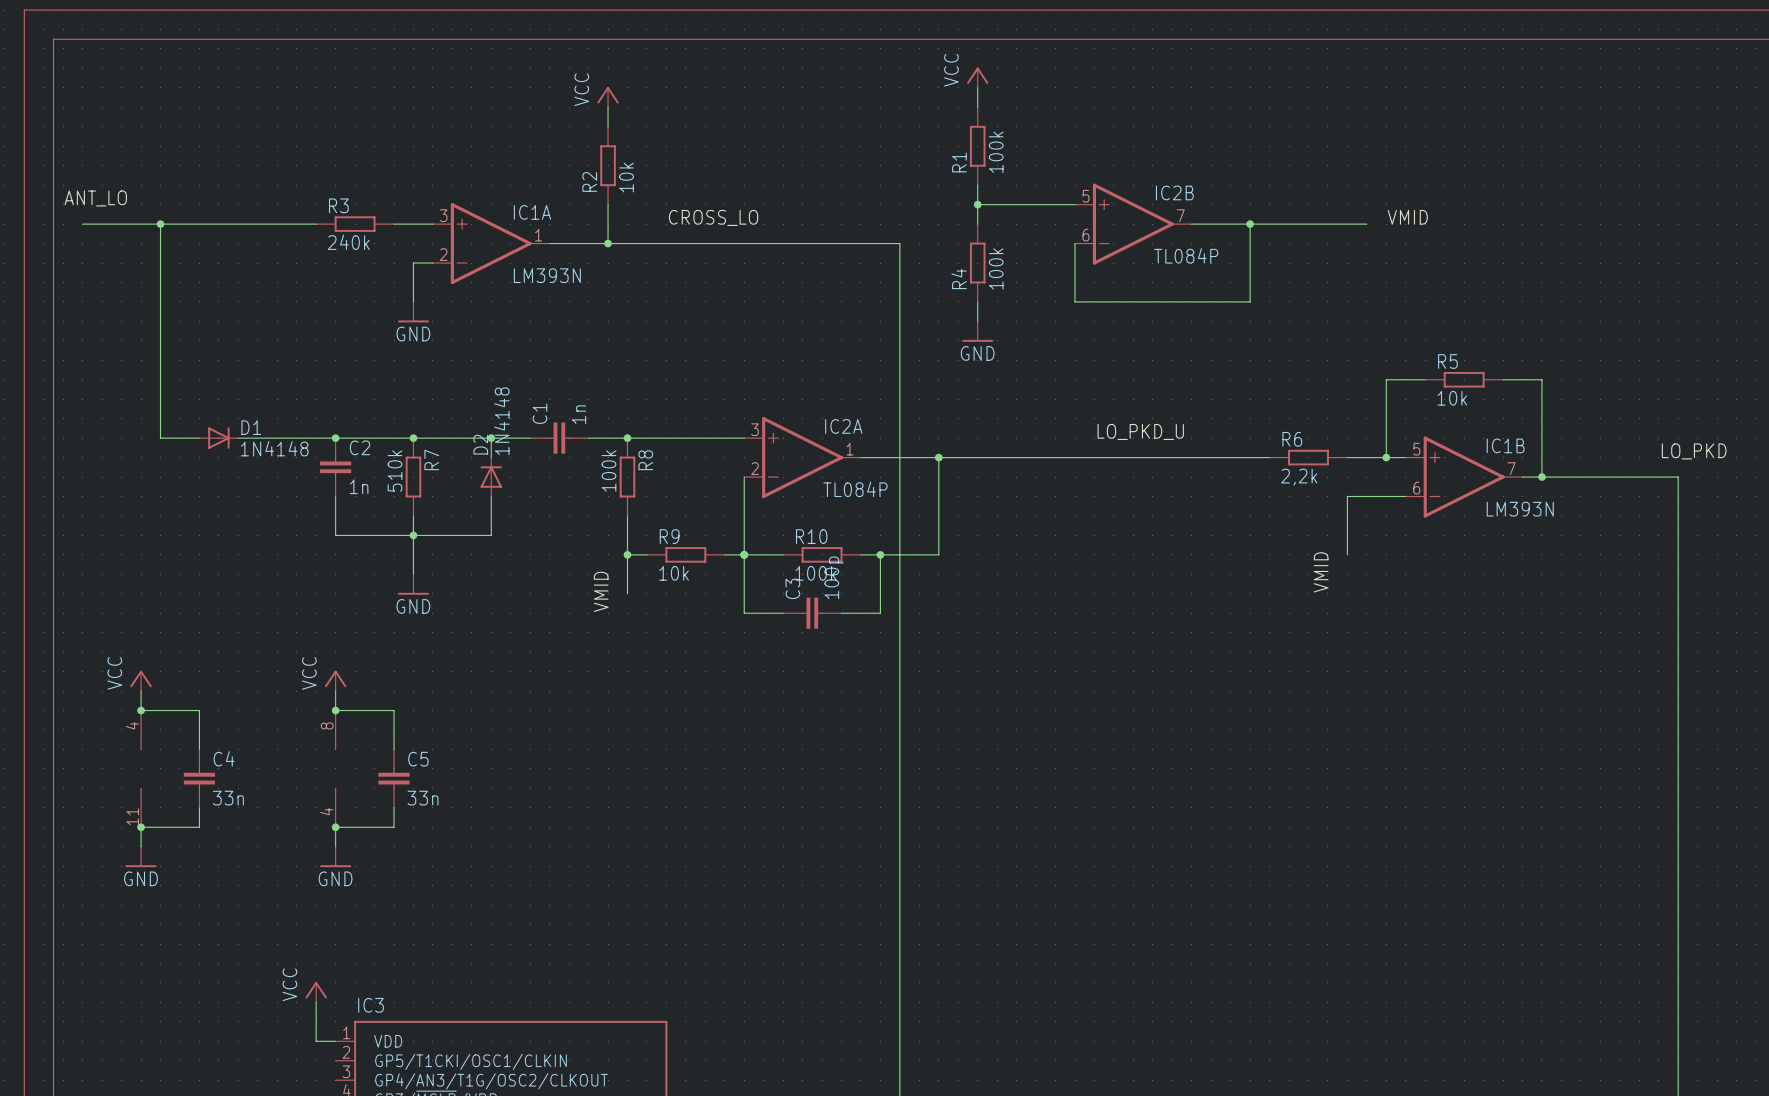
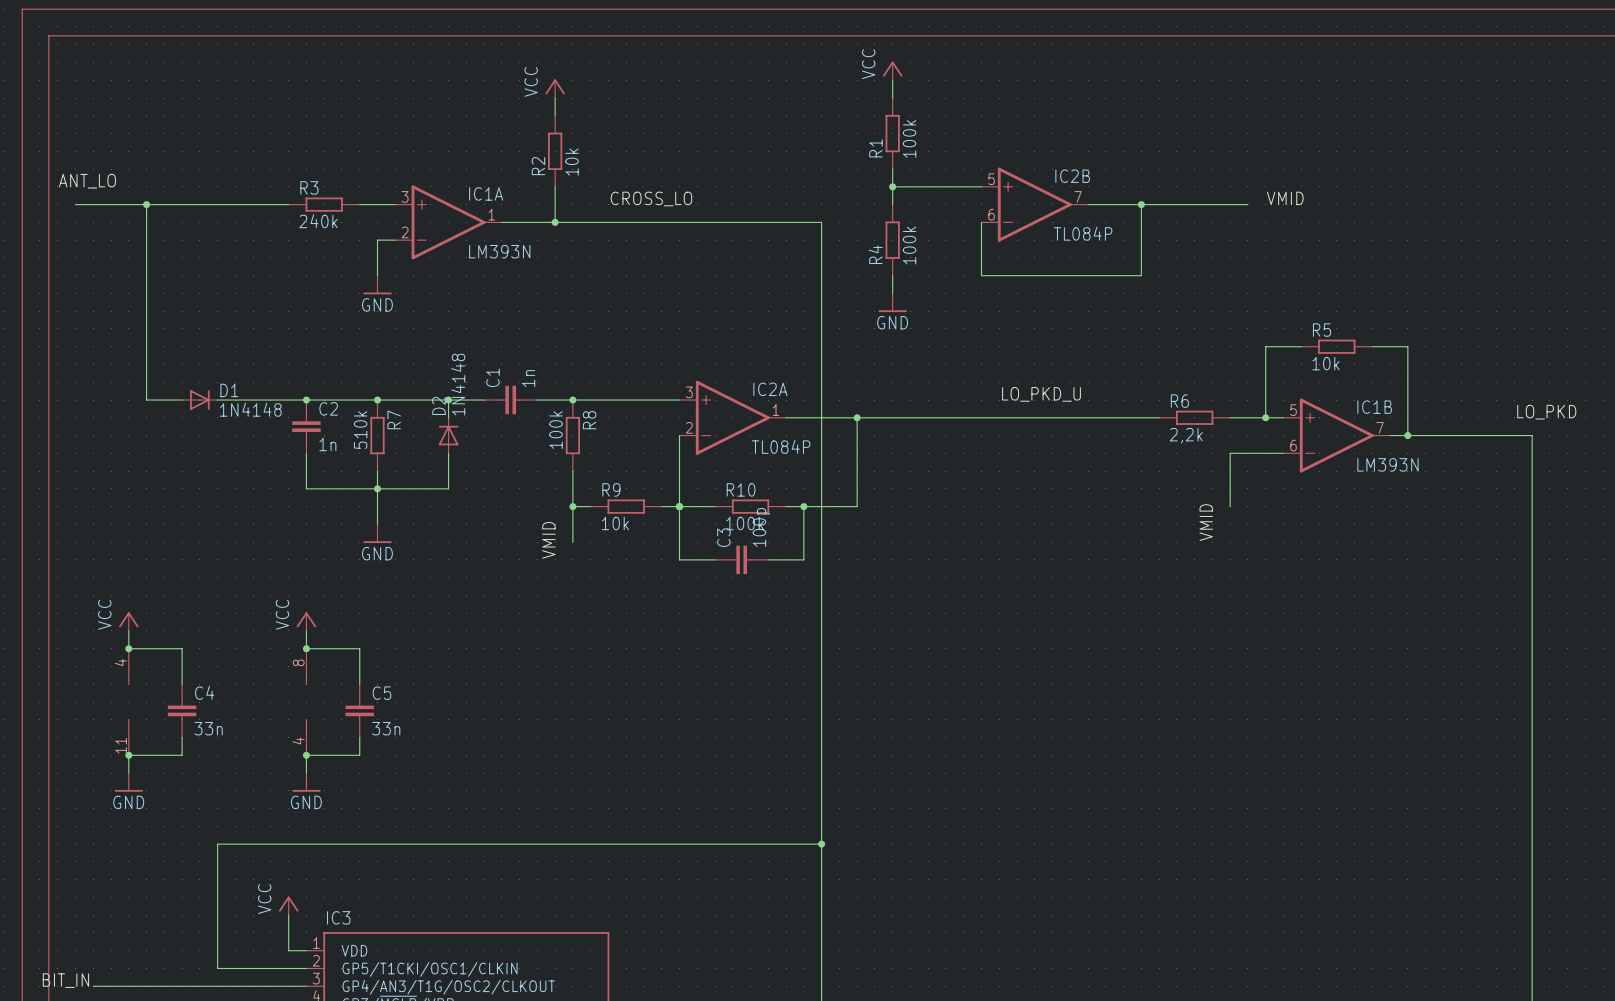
wire: none -> (821, 844) (217, 844) (217, 968) (306, 968)
junction: none -> (821, 844)
label: none -> BIT_IN (65, 980)
wire: none -> (93, 986) (306, 986)

